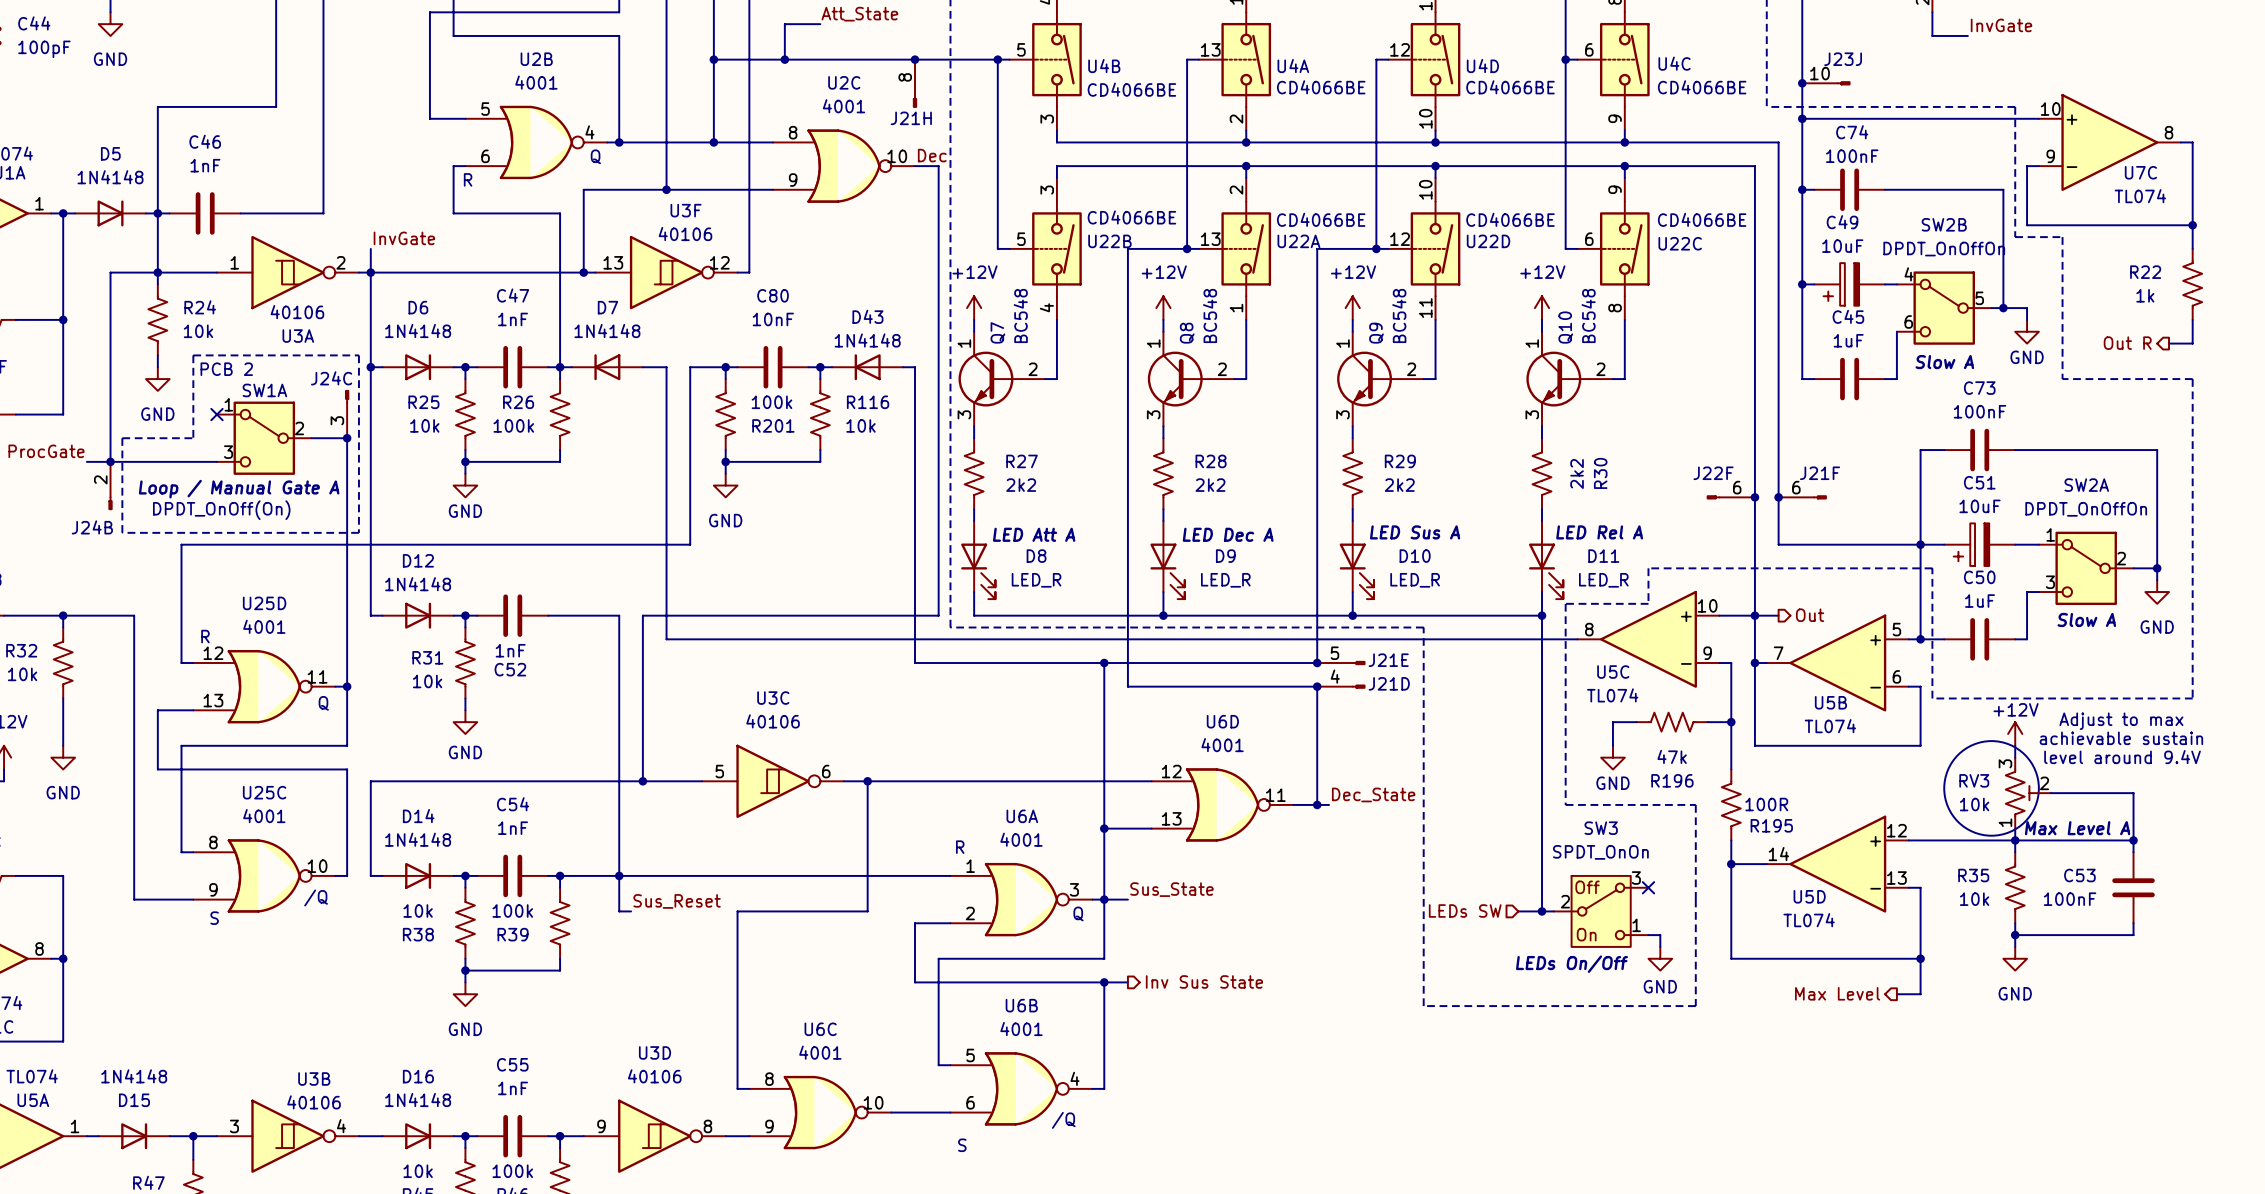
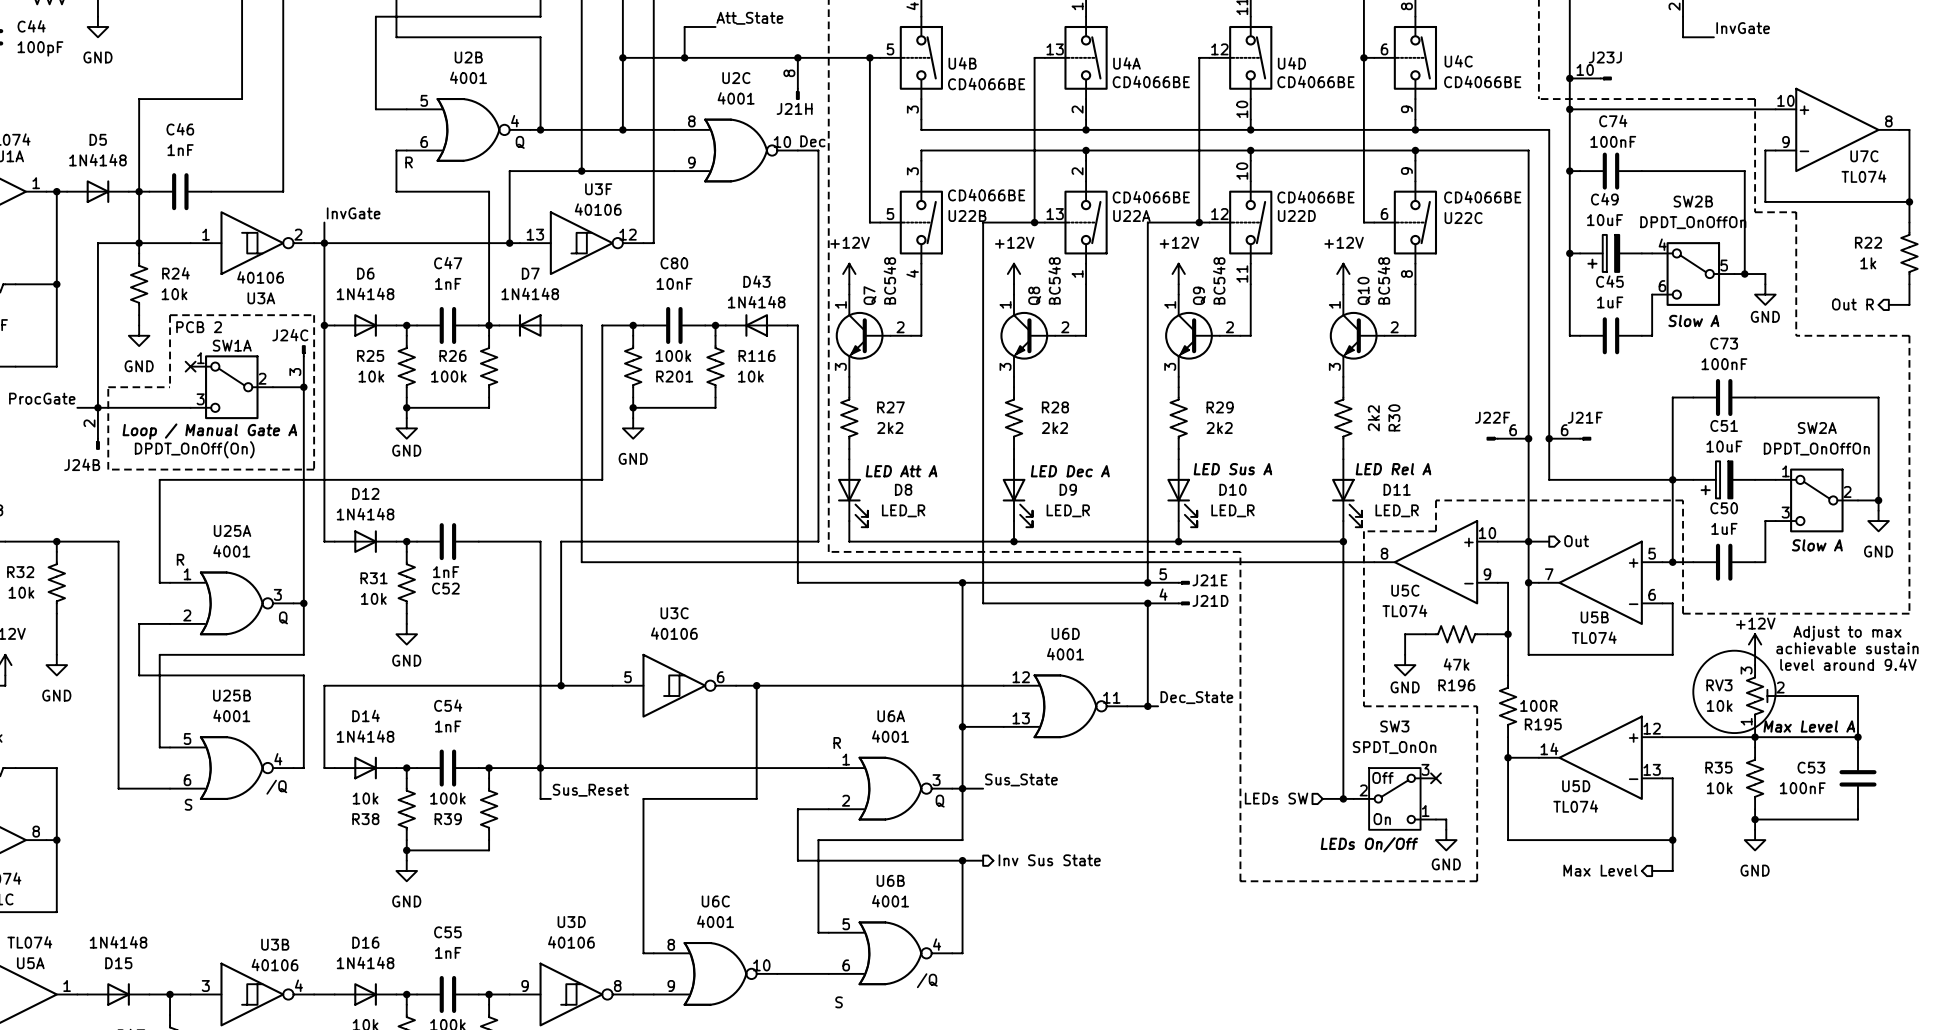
U25D name: U25D (264, 603) -> U25A (232, 530)
U25D pin number: 12 (213, 653) -> 1 (187, 574)
U25D pin number: 11 (317, 676) -> 3 (277, 594)
U25D pin number: 13 (213, 700) -> 2 (187, 615)
U25C name: U25C (264, 792) -> U25B (232, 695)
U25C pin number: 8 (213, 842) -> 5 (187, 738)
U25C pin number: 10 (317, 866) -> 4 (278, 759)
U25C pin number: 9 (213, 889) -> 6 (187, 780)

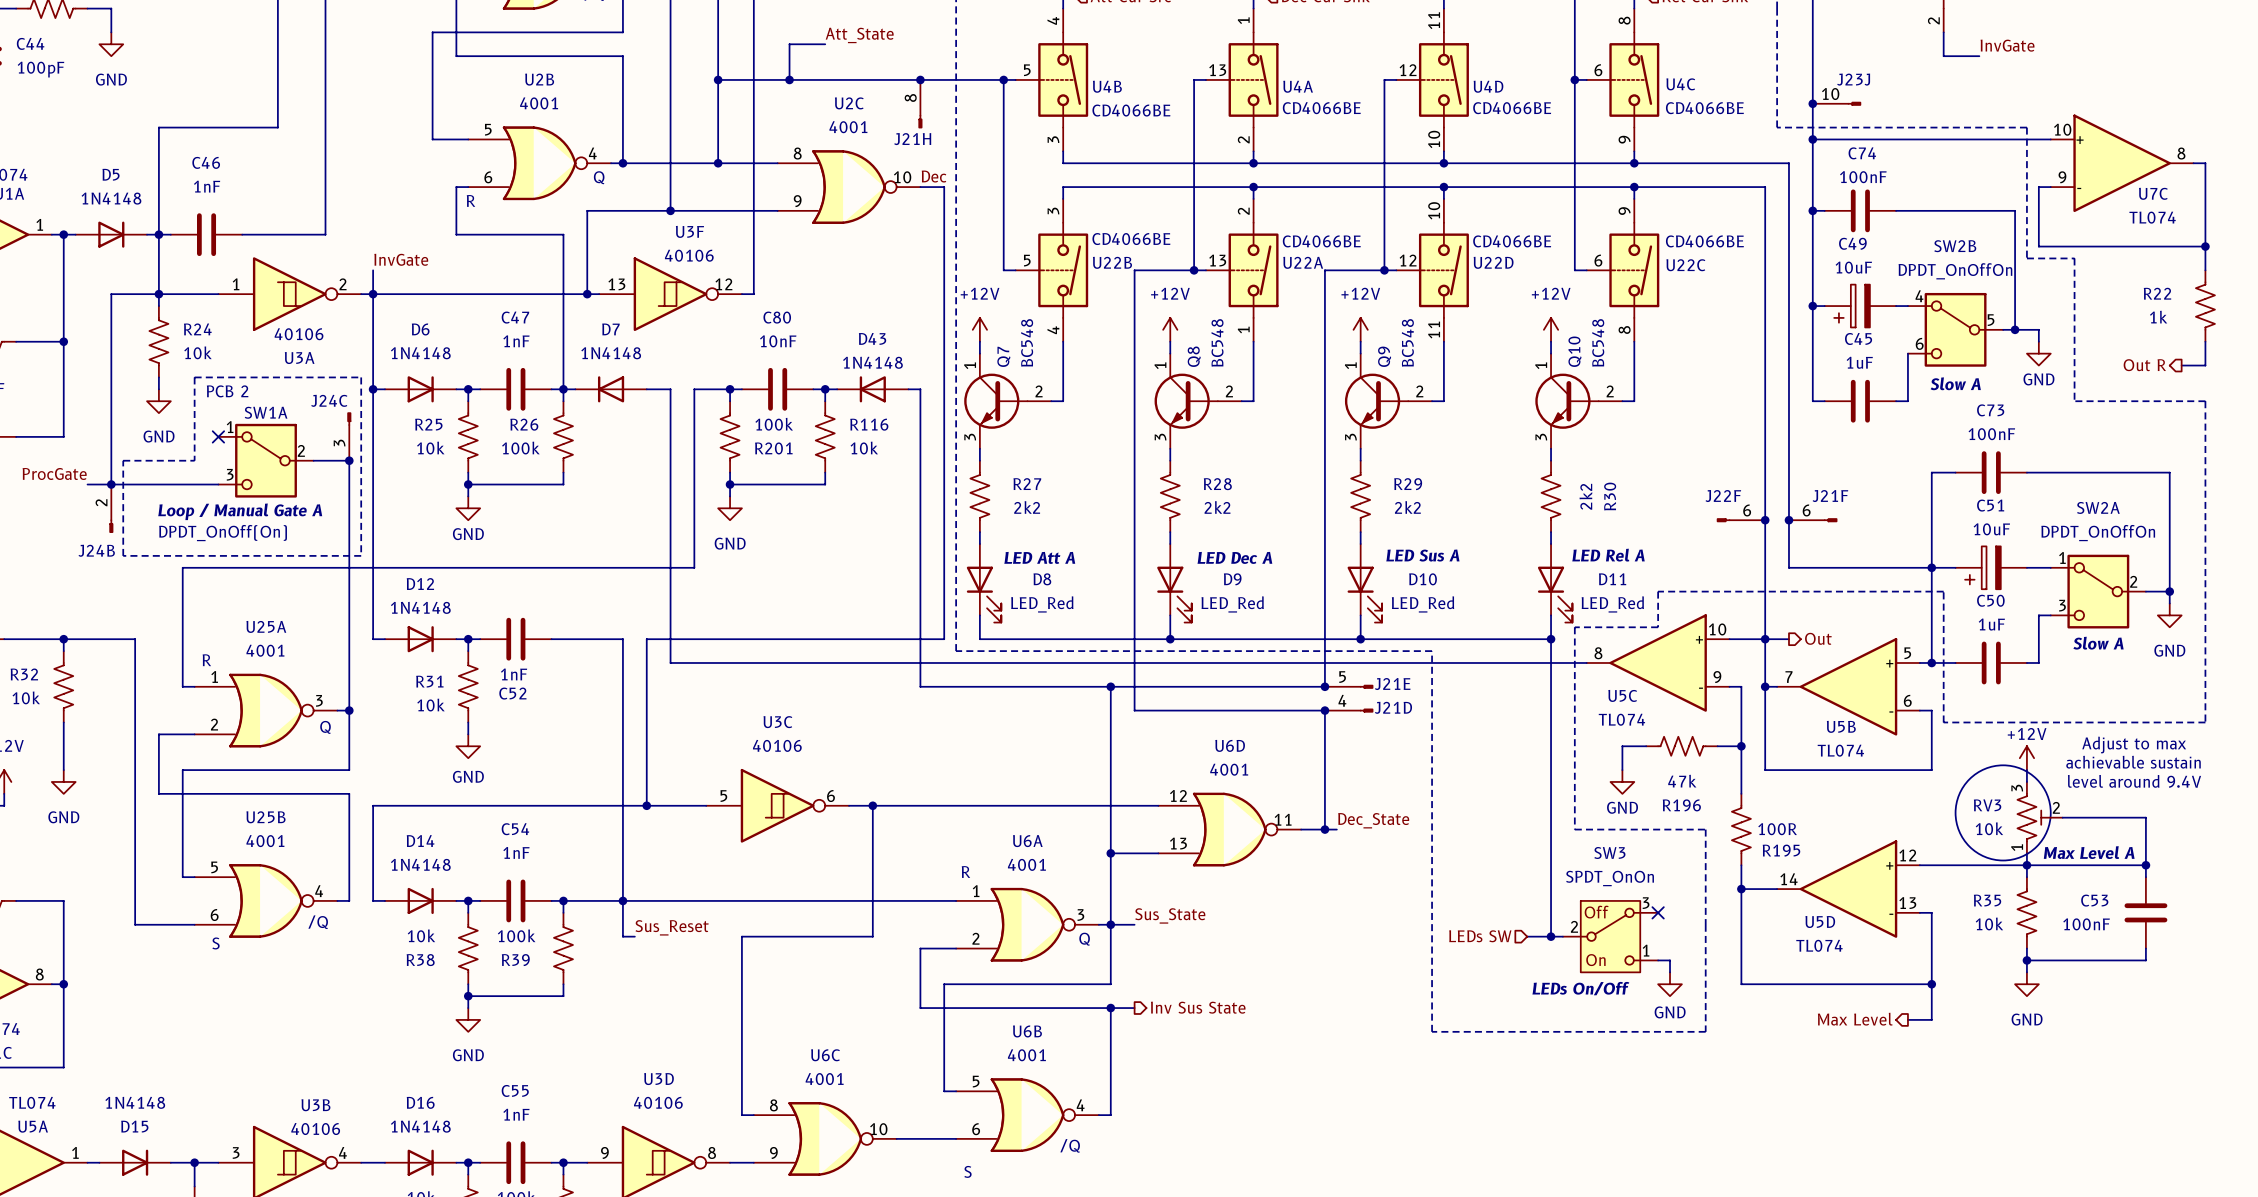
D8 value: LED_R (903, 510) -> LED_Red (1042, 604)
D9 value: LED_R (1068, 510) -> LED_Red (1232, 604)
D10 value: LED_R (1232, 510) -> LED_Red (1423, 604)
D11 value: LED_R (1397, 510) -> LED_Red (1612, 604)

